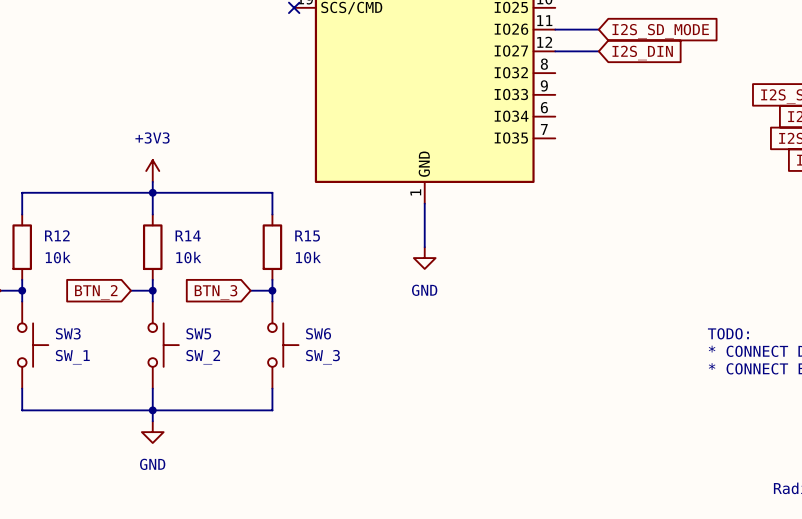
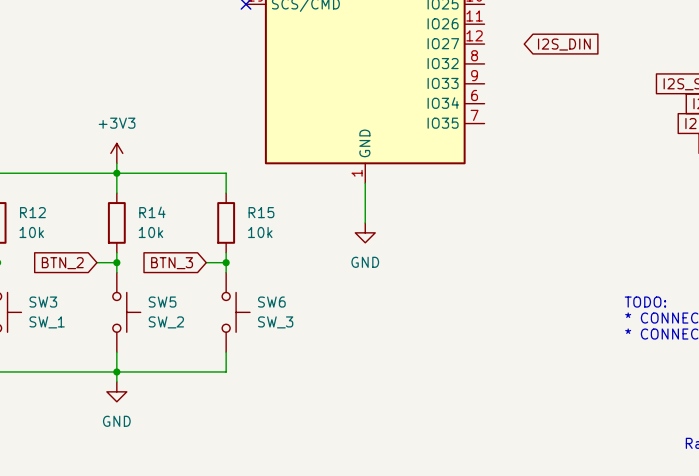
wire: (555, 29) (598, 29) -> none
global label: I2S_SD_MODE (660, 31) -> none
wire: (555, 51) (598, 51) -> none

